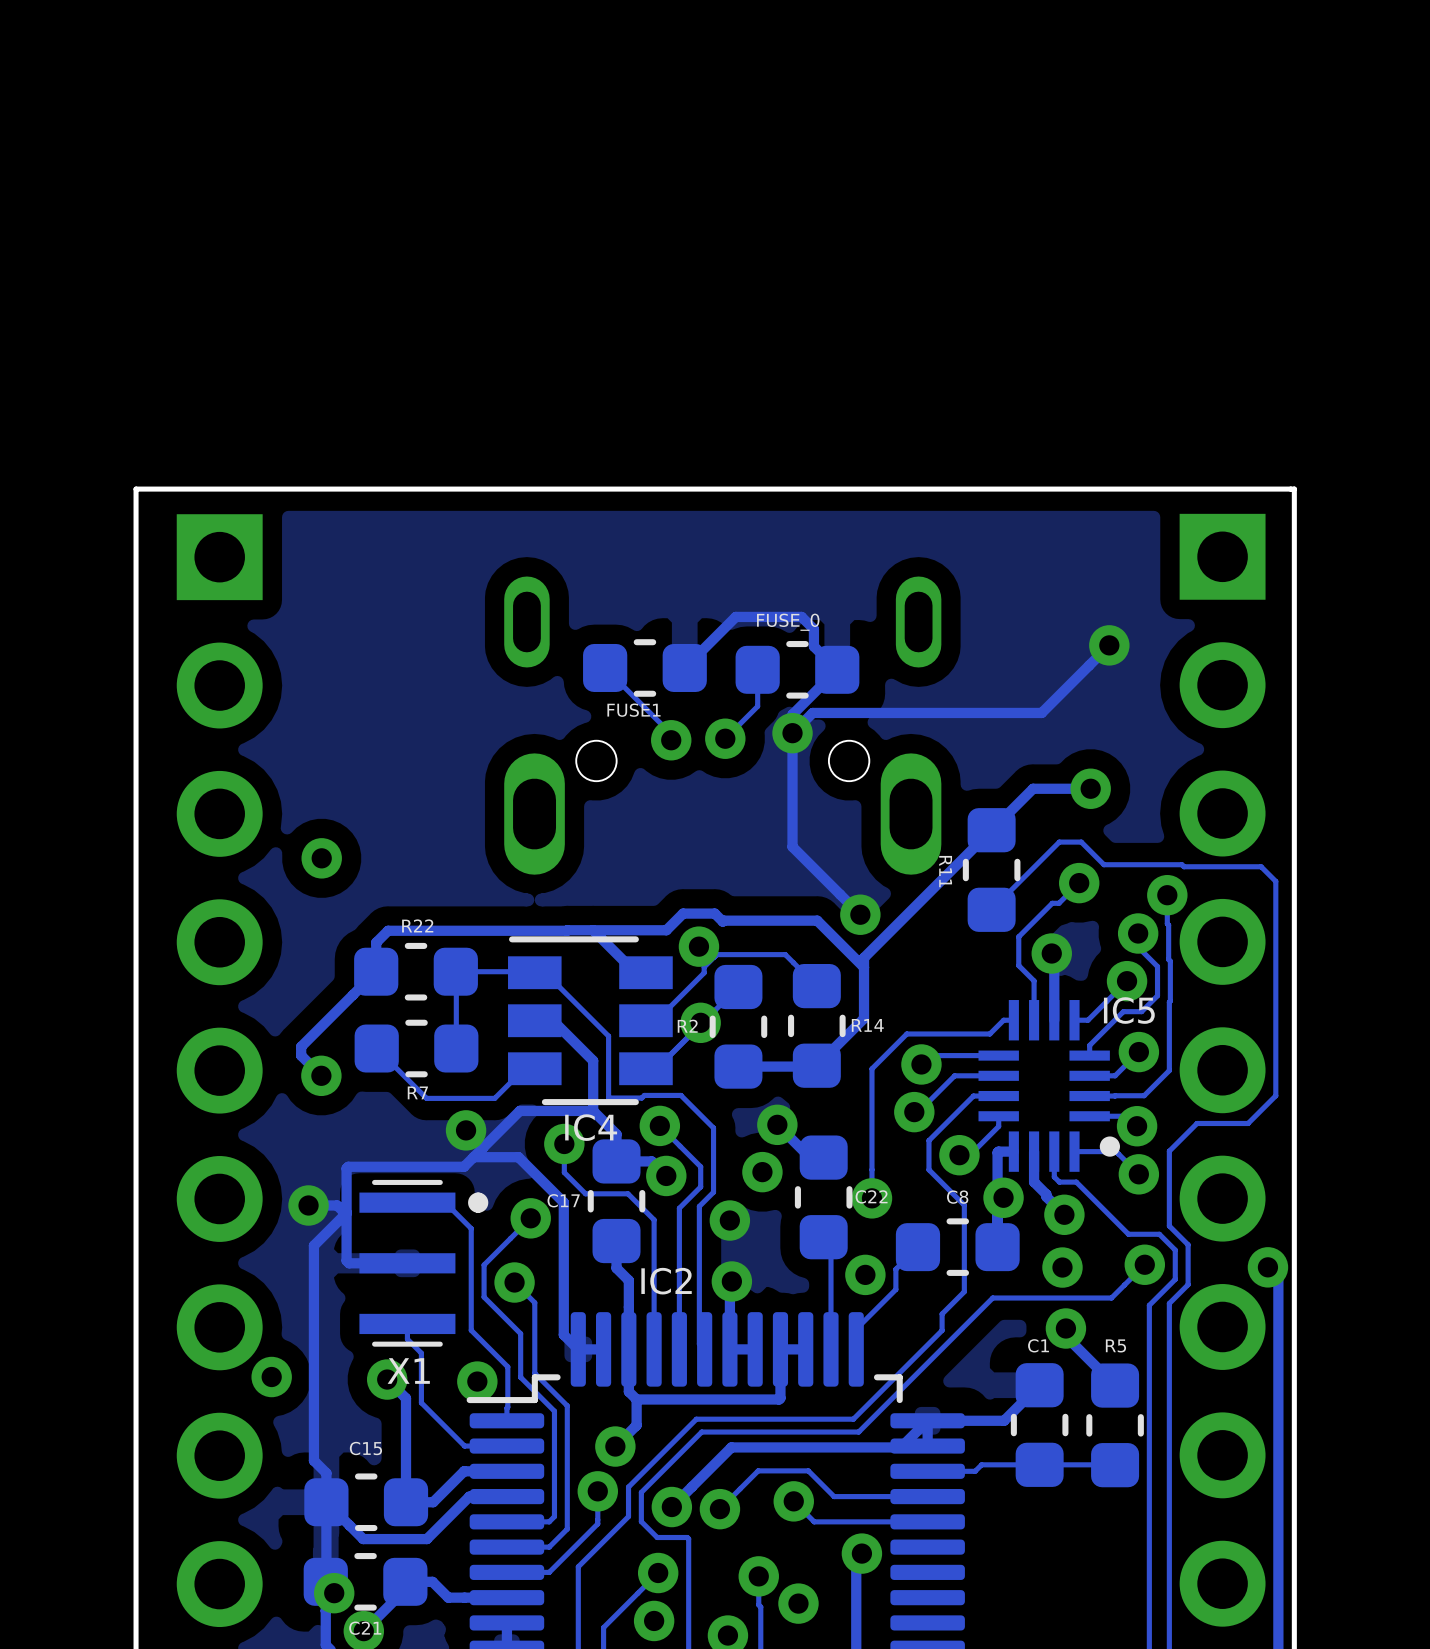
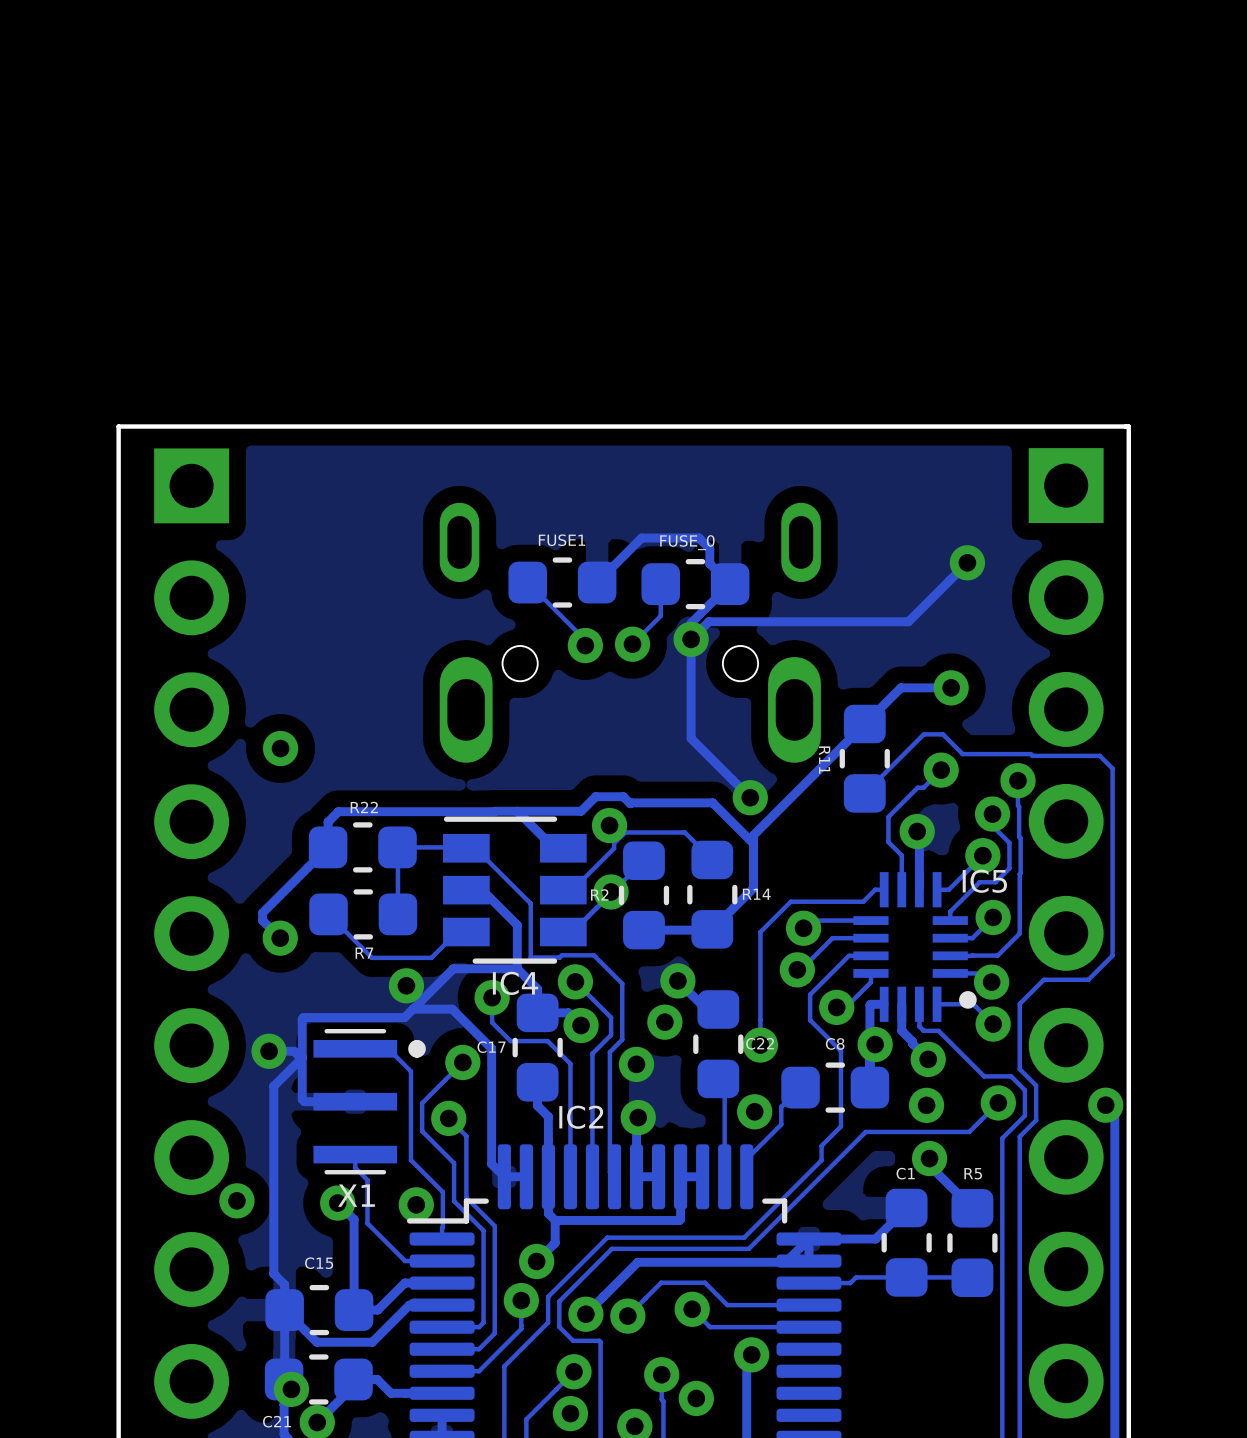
FUSE1 name position: FUSE1 (633, 710) -> FUSE1 (562, 540)
C21 name position: C21 (365, 1628) -> C21 (277, 1421)

